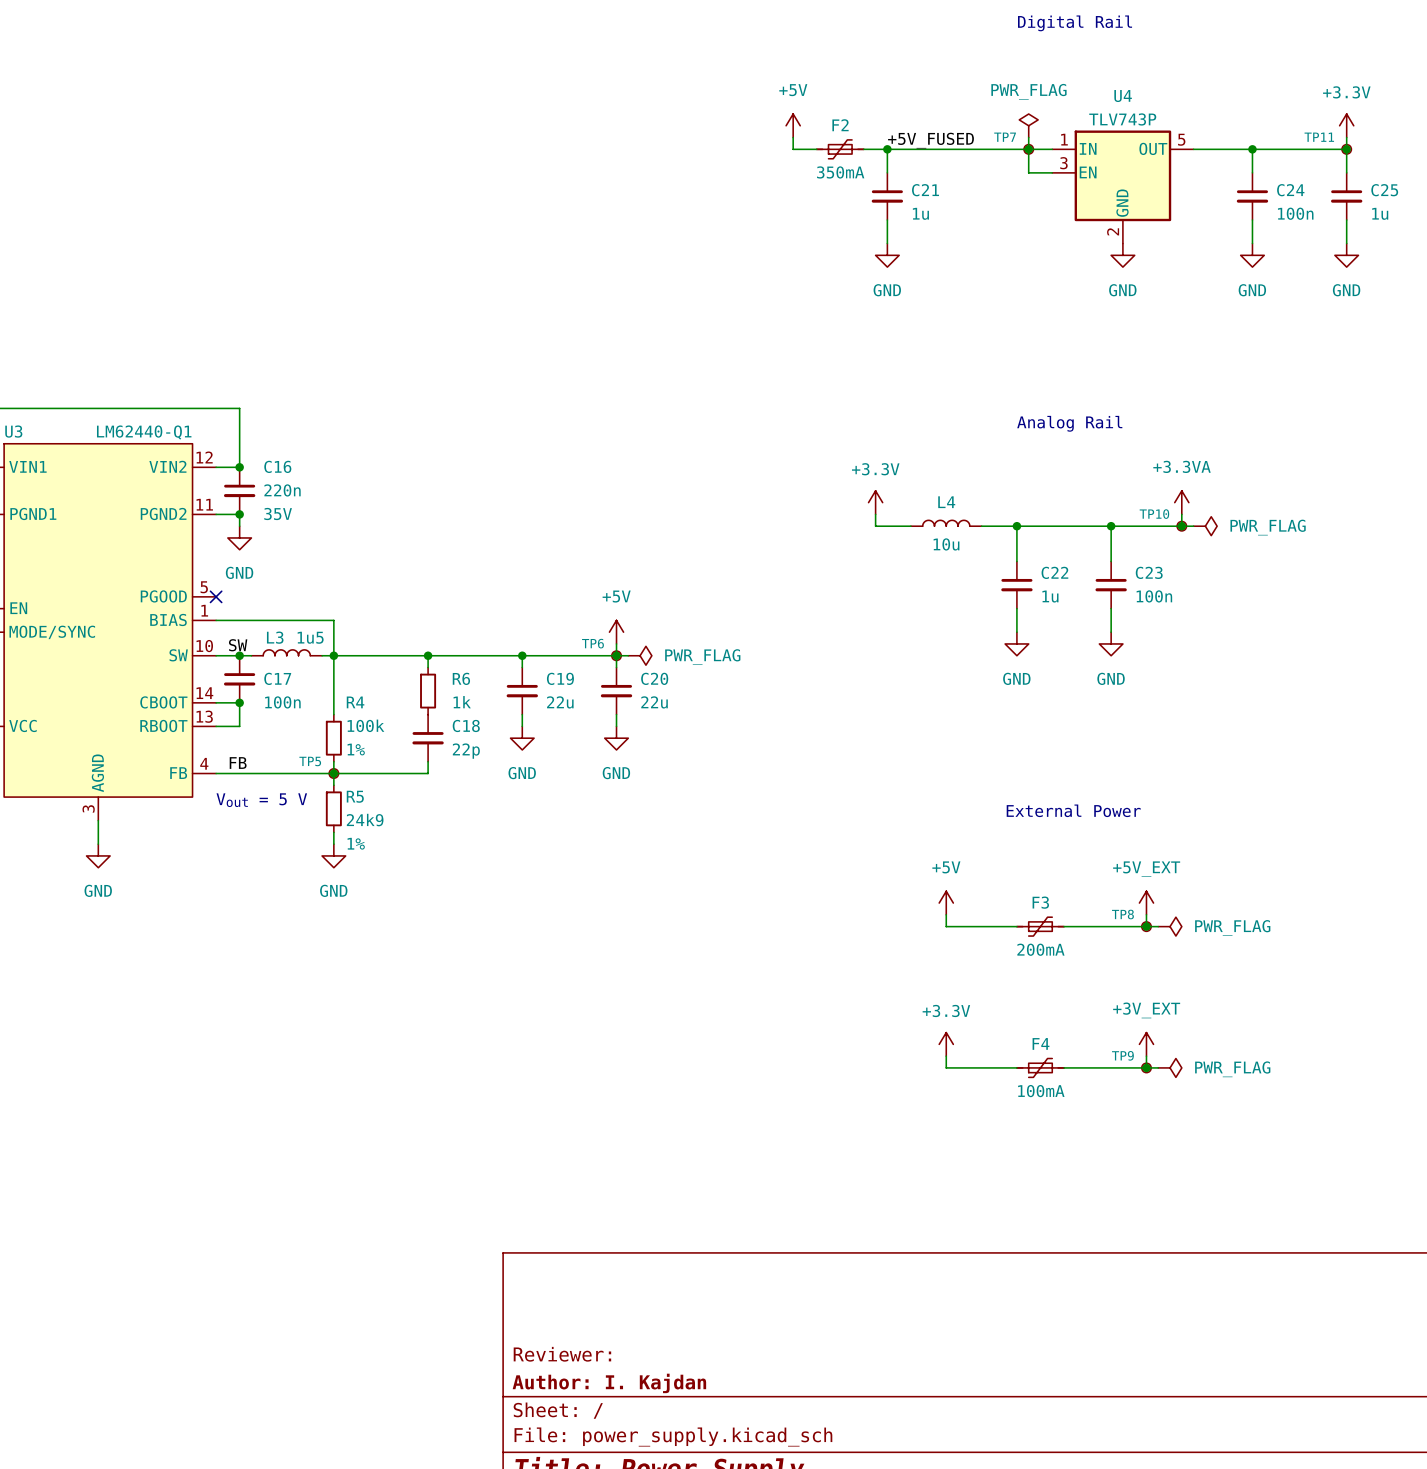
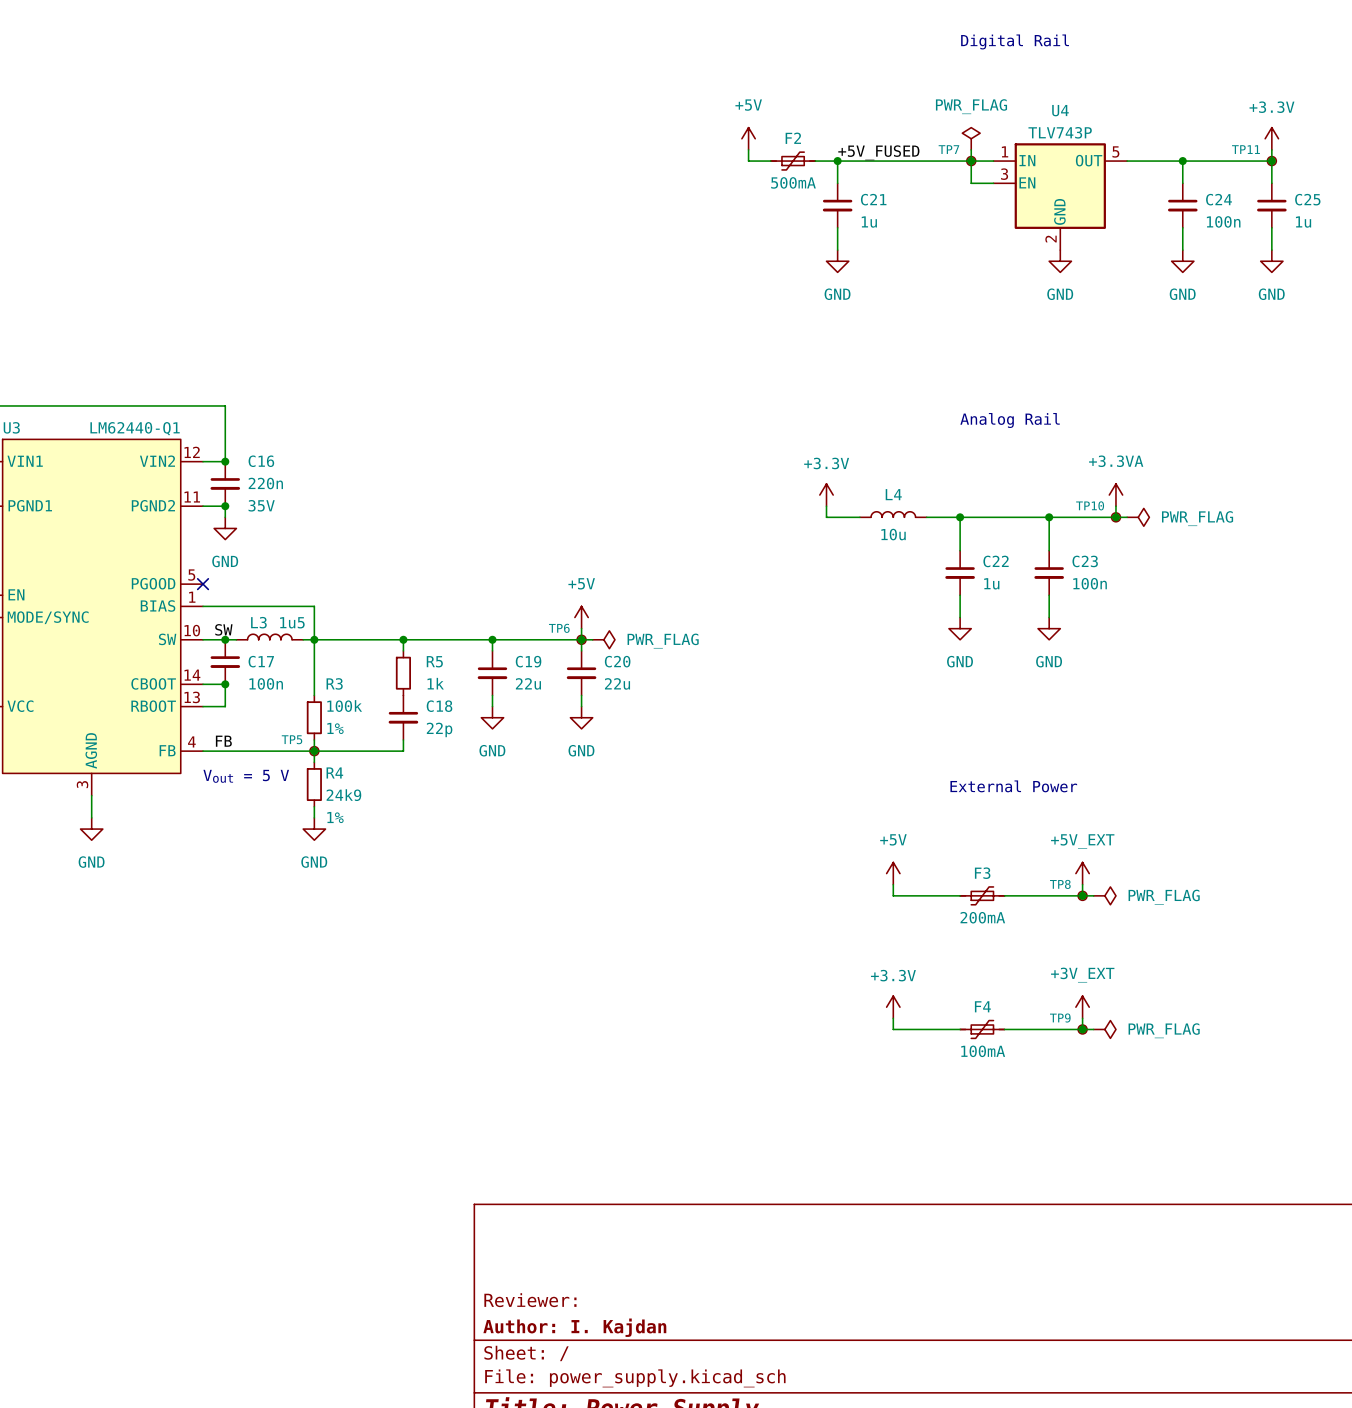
F2 value: 350mA (840, 172) -> 500mA (793, 182)
R6 name: R6 (461, 678) -> R5 (434, 661)
R4 name: R4 (355, 702) -> R3 (334, 683)
R5 name: R5 (355, 796) -> R4 (334, 772)

